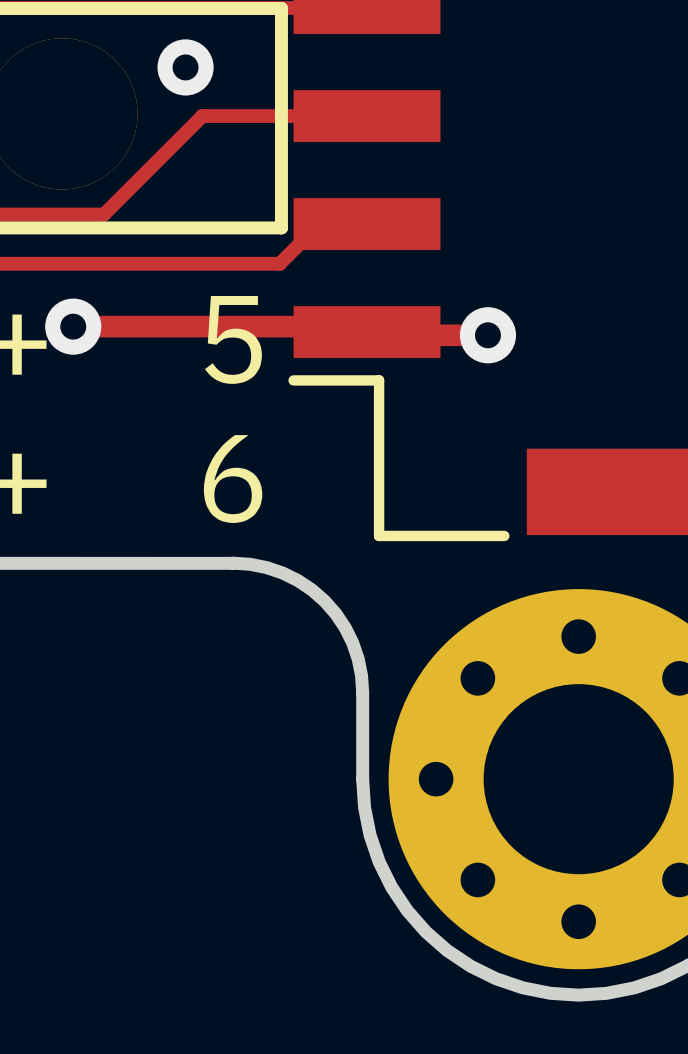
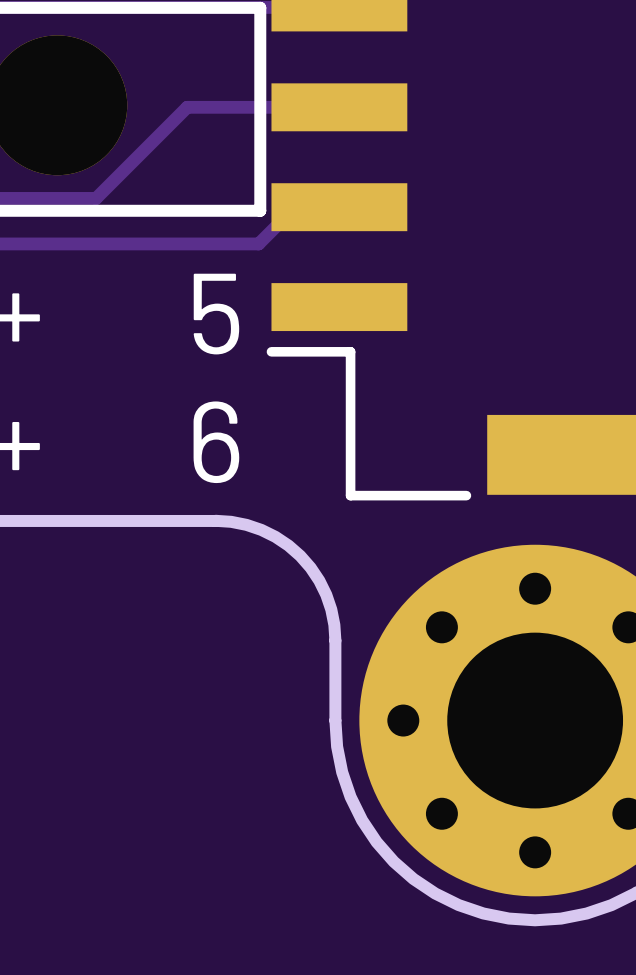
via: (185, 67) -> none
track: (73, 326) (361, 326) (370, 335) (487, 335) -> none
via: (73, 326) -> none
via: (487, 335) -> none

